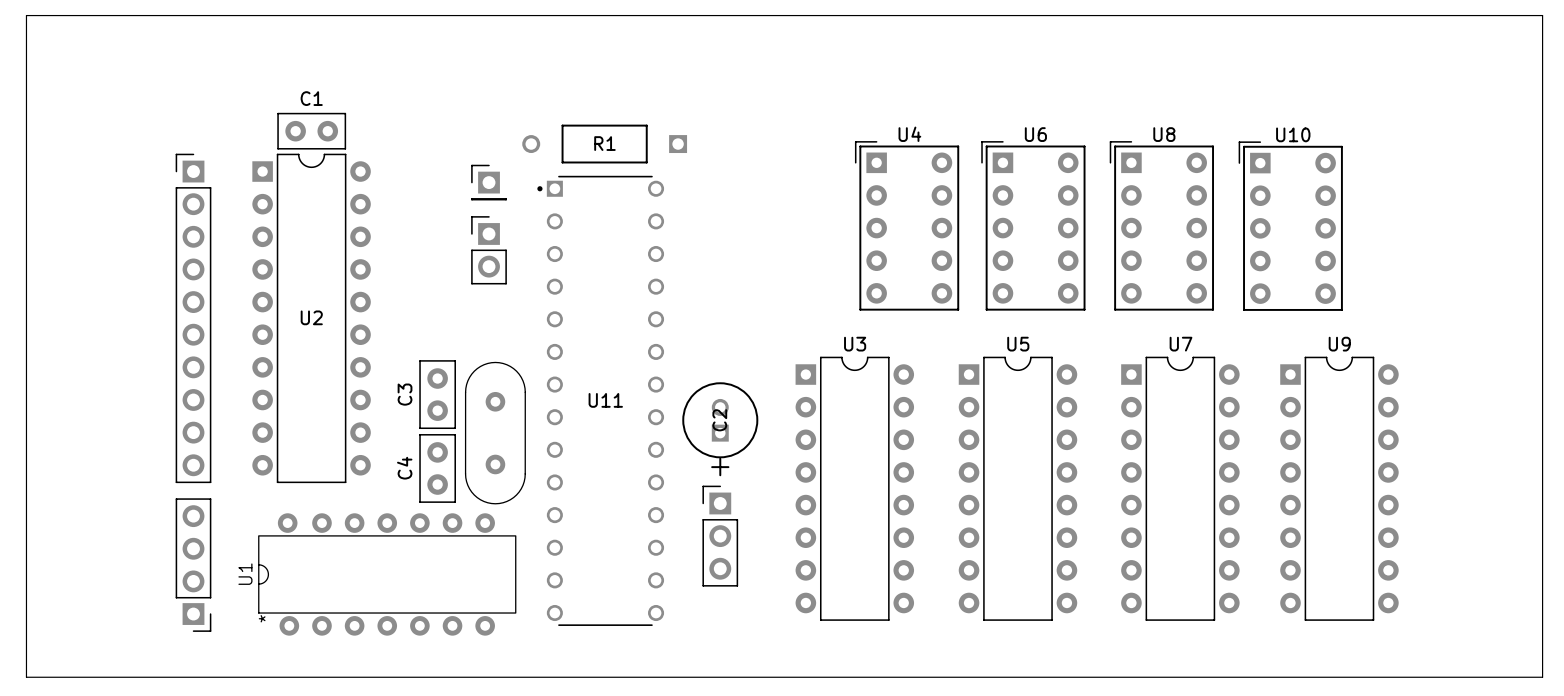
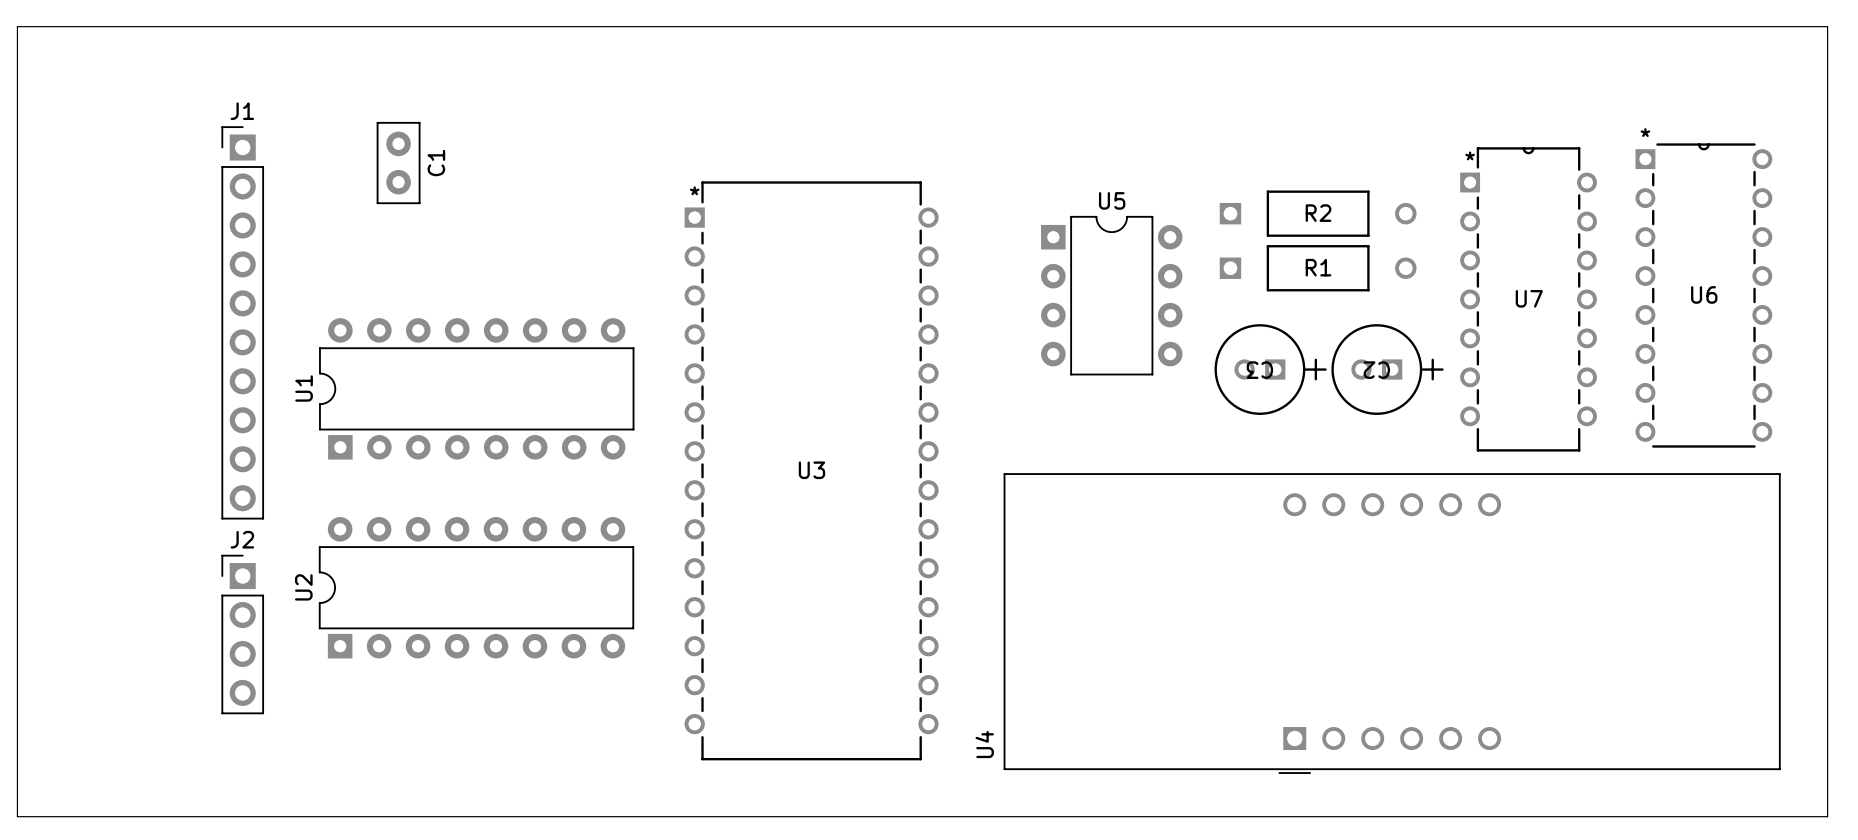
C1 rotation: 0° (311, 131) -> 90° clockwise (398, 163)
U4 name position: U4 (909, 134) -> U4 (984, 744)
U6 name position: U6 (1035, 134) -> U6 (1704, 294)
U4 footprint: [854, 141, 960, 311] -> [1003, 473, 1781, 774]
U6 footprint: [981, 141, 1086, 311] -> [1635, 143, 1773, 448]
R1 rotation: 0° (604, 144) -> 180° (1318, 268)
R1 position: (604, 144) -> (1318, 268)
U2 footprint: [252, 153, 371, 484] -> [318, 517, 635, 659]
R2: none -> (1318, 213)
part: (489, 182) -> none
U8: (1161, 225) -> none
U10: (1290, 226) -> none
part: (489, 250) -> none
J1: none -> (242, 322)
U2 name position: U2 (311, 317) -> U2 (303, 587)
part: (193, 318) -> none
U3 name position: U3 (855, 344) -> U3 (811, 470)
U5 name position: U5 (1018, 344) -> U5 (1112, 200)
U7 name position: U7 (1181, 344) -> U7 (1529, 298)
U3 footprint: [795, 356, 915, 621] -> [684, 181, 939, 761]
U5 footprint: [958, 356, 1078, 621] -> [1041, 215, 1183, 376]
U7 footprint: [1121, 356, 1240, 621] -> [1460, 147, 1597, 452]
C3 footprint: [419, 360, 456, 430] -> [1214, 324, 1327, 415]
U11: (600, 400) -> none
C2 rotation: 0° (720, 429) -> 90° counterclockwise (1387, 369)
C2 position: (720, 429) -> (1387, 369)
part: (495, 433) -> none
C4: (437, 468) -> none
U9: (1339, 488) -> none
U1 footprint: [258, 513, 517, 636] -> [319, 318, 635, 460]
J2: none -> (242, 634)
part: (720, 536) -> none
part: (193, 565) -> none

